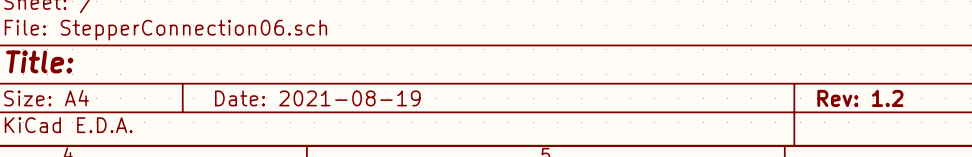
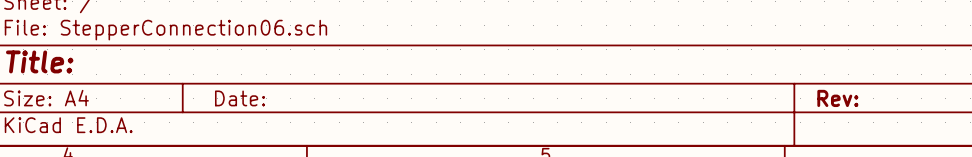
title block: Date: 2021-08-19 (317, 98) -> Date: (240, 98)
title block: Rev: 1.2 (860, 98) -> Rev: (837, 98)

